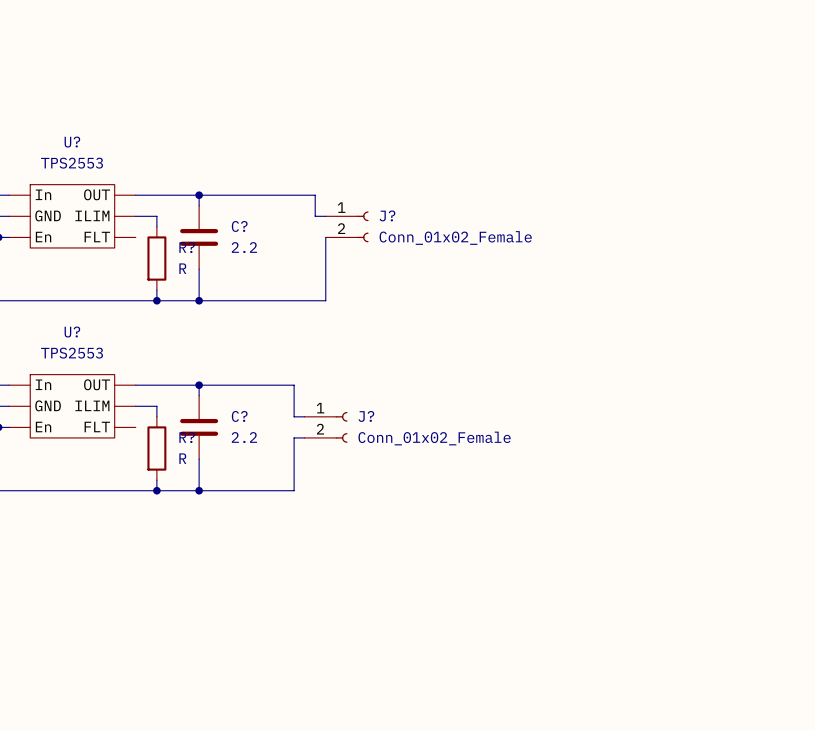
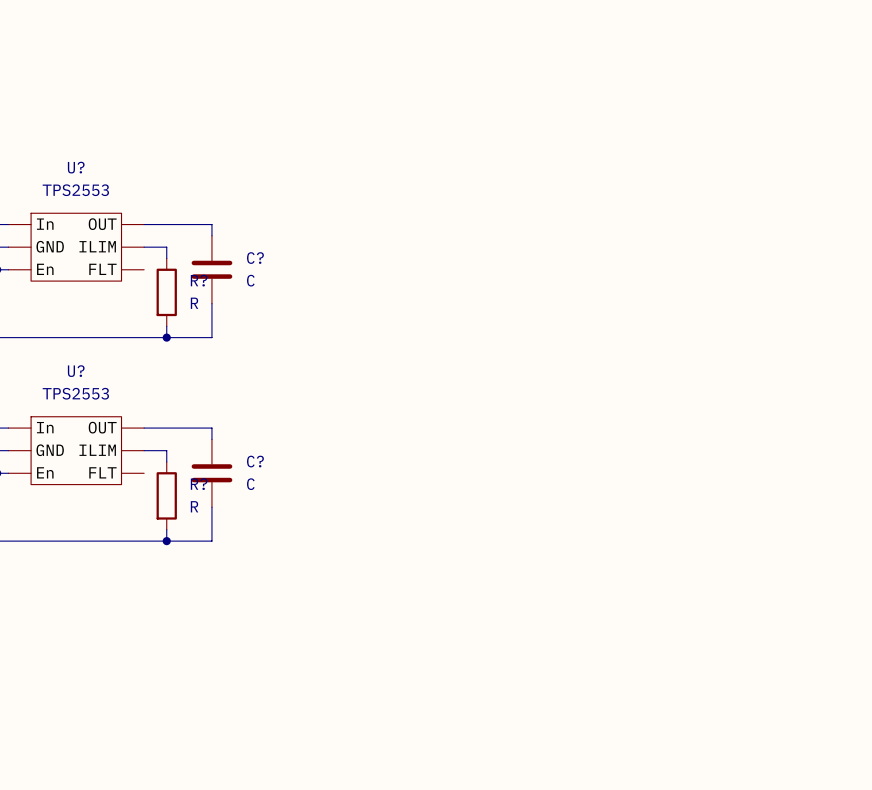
wire: (199, 195) (315, 195) (315, 216) (325, 216) -> none
junction: (199, 195) -> none
J?: Conn_01x02_Female (347, 226) -> none
wire: (325, 237) (325, 300) (199, 300) -> none
C? value: 2.2 (244, 247) -> C (250, 280)
junction: (199, 300) -> none
wire: (199, 385) (294, 385) (294, 416) (304, 416) -> none
junction: (199, 385) -> none
J?: Conn_01x02_Female (326, 427) -> none
C? value: 2.2 (244, 437) -> C (250, 484)
wire: (304, 437) (294, 437) (294, 490) (199, 490) -> none
junction: (199, 490) -> none

